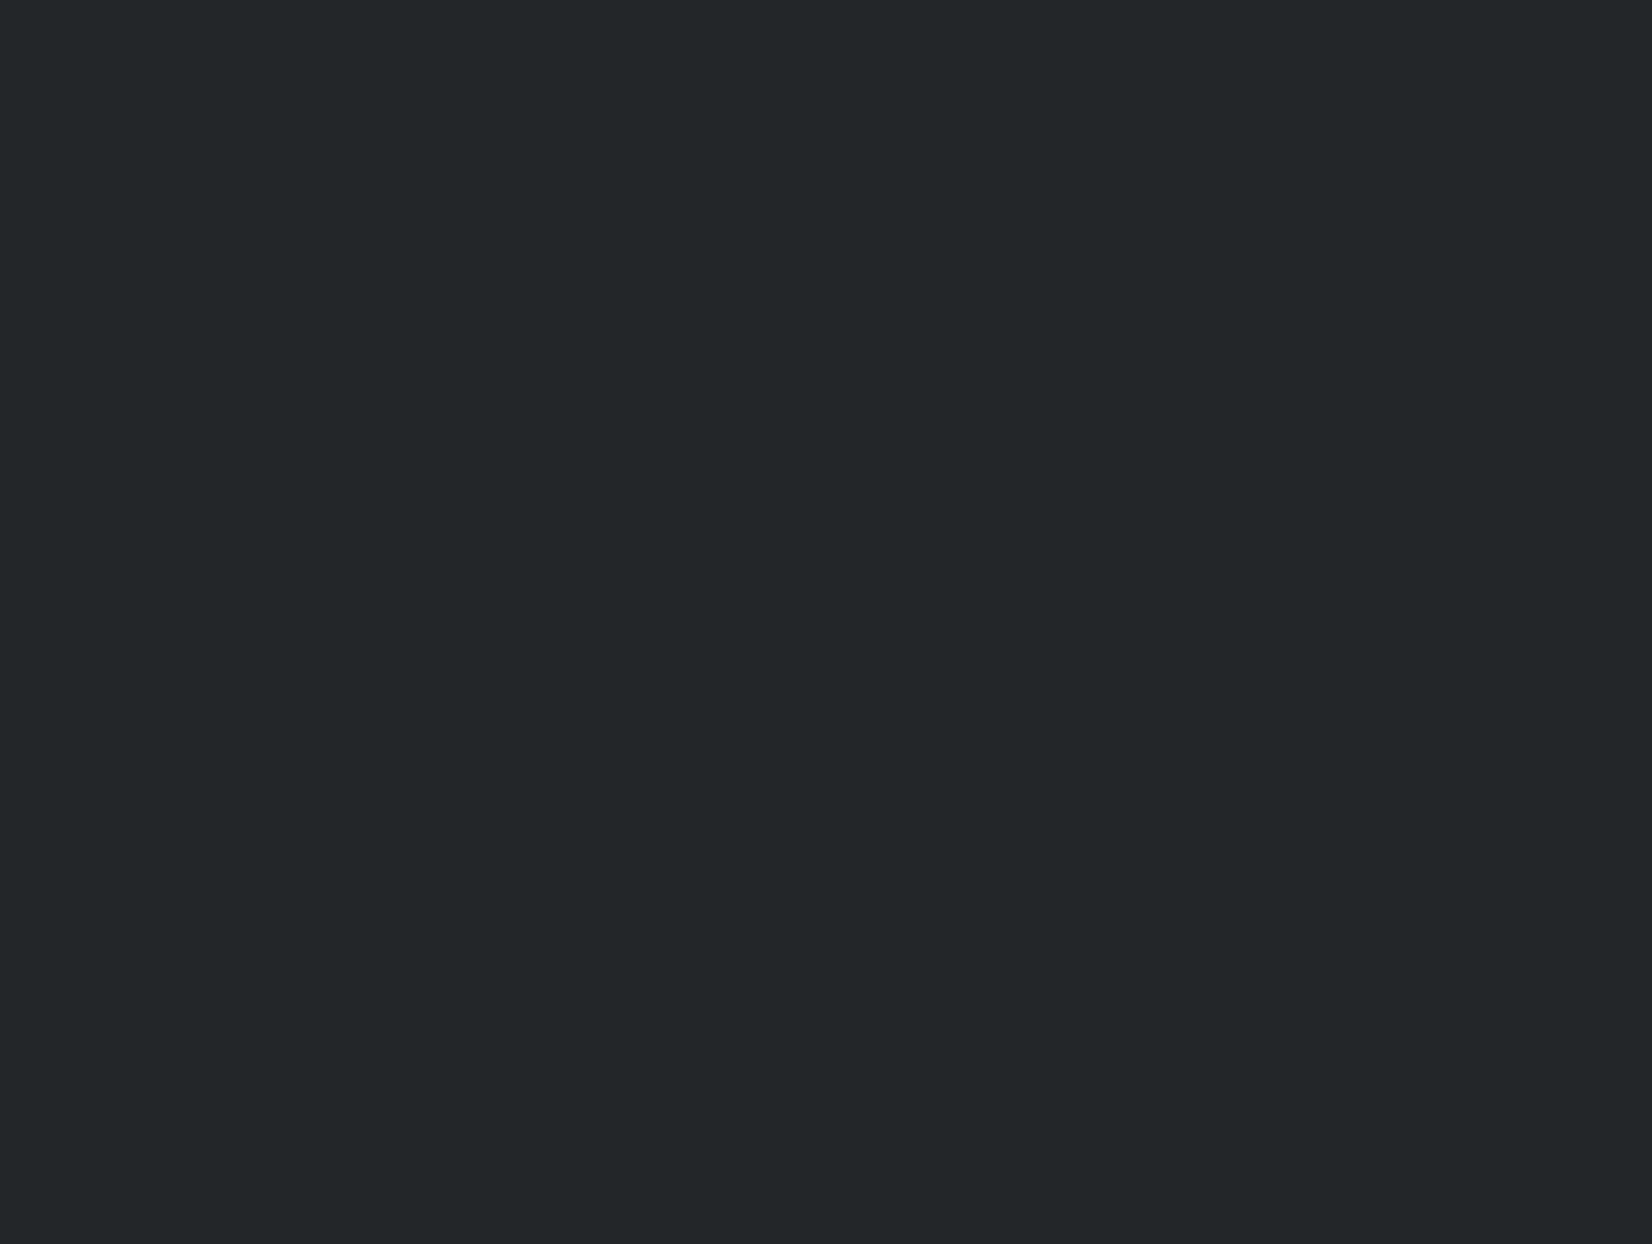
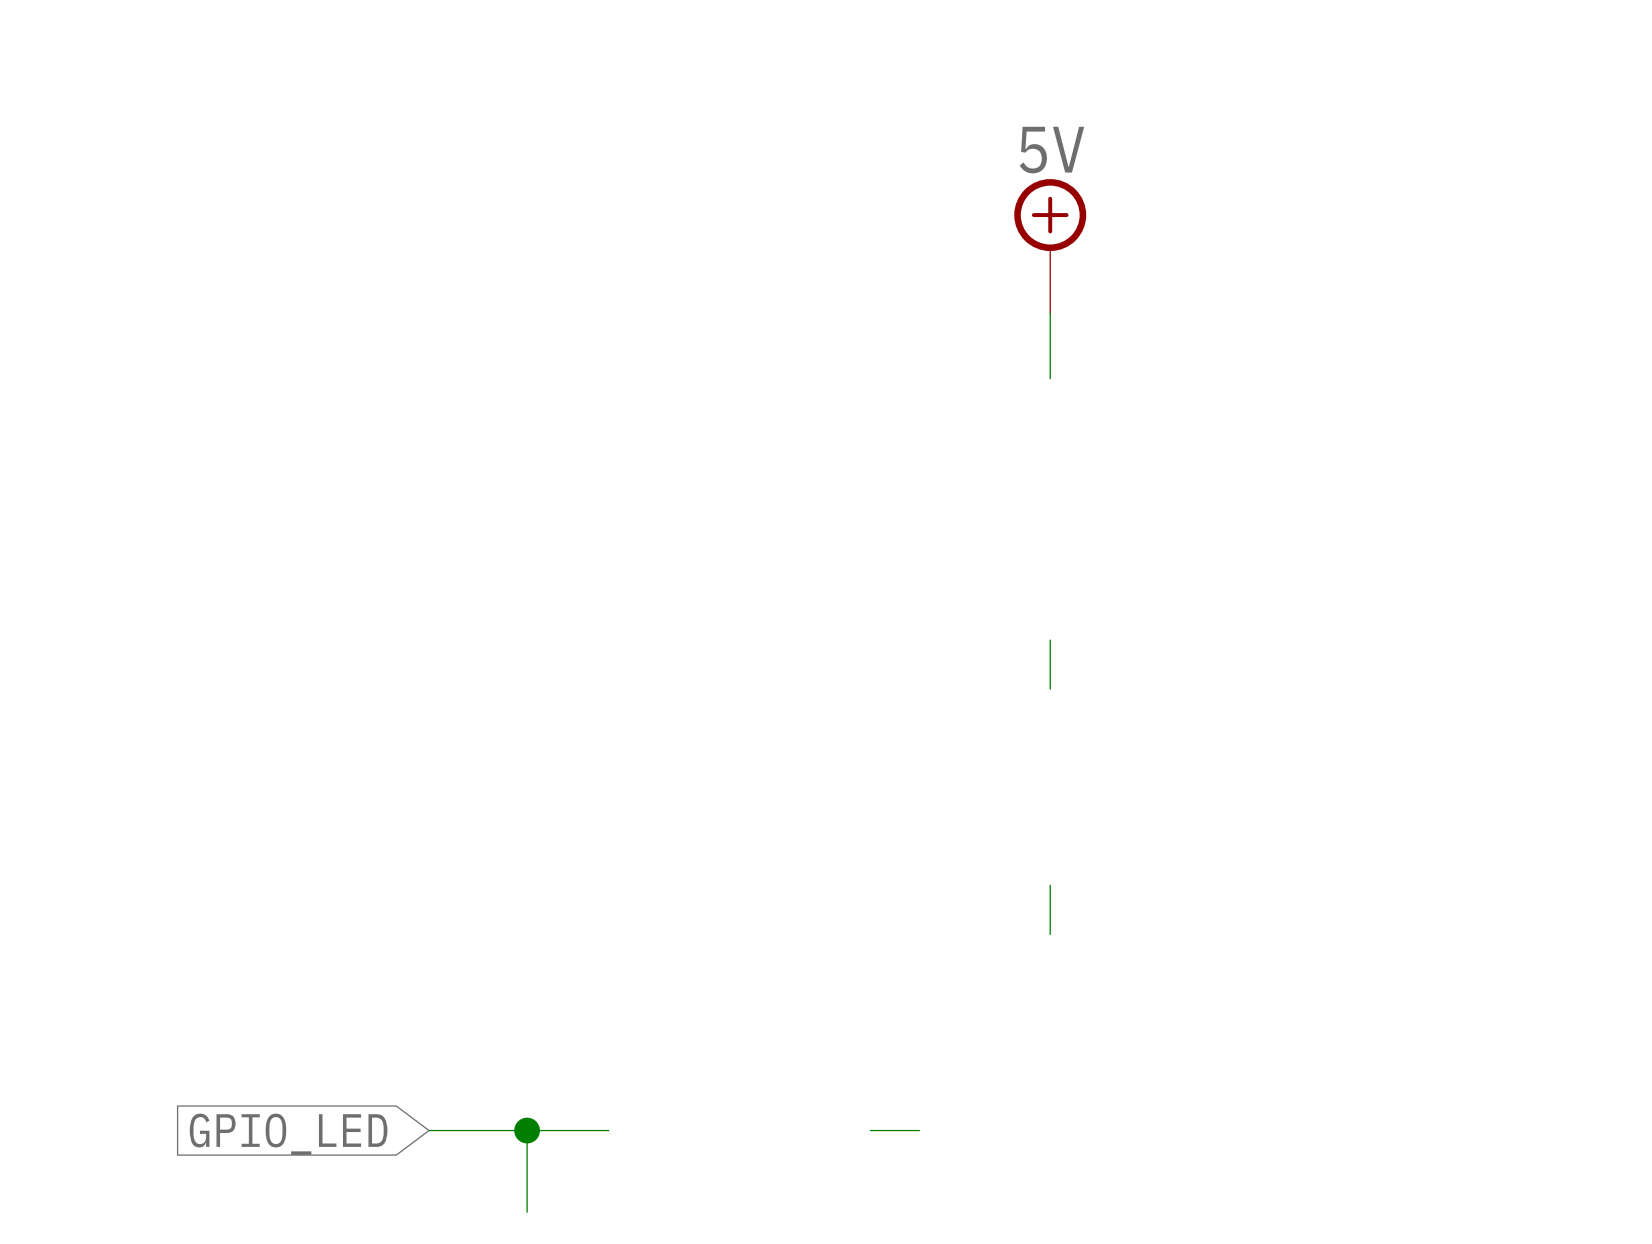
power symbol: none -> 5V (1050, 246)
wire: none -> (1050, 313) (1050, 378)
wire: none -> (1050, 640) (1050, 689)
wire: none -> (1050, 885) (1050, 934)
wire: none -> (429, 1130) (608, 1130)
wire: none -> (527, 1130) (527, 1212)
junction: none -> (527, 1130)
wire: none -> (870, 1130) (919, 1130)
global label: none -> GPIO_LED (288, 1134)

